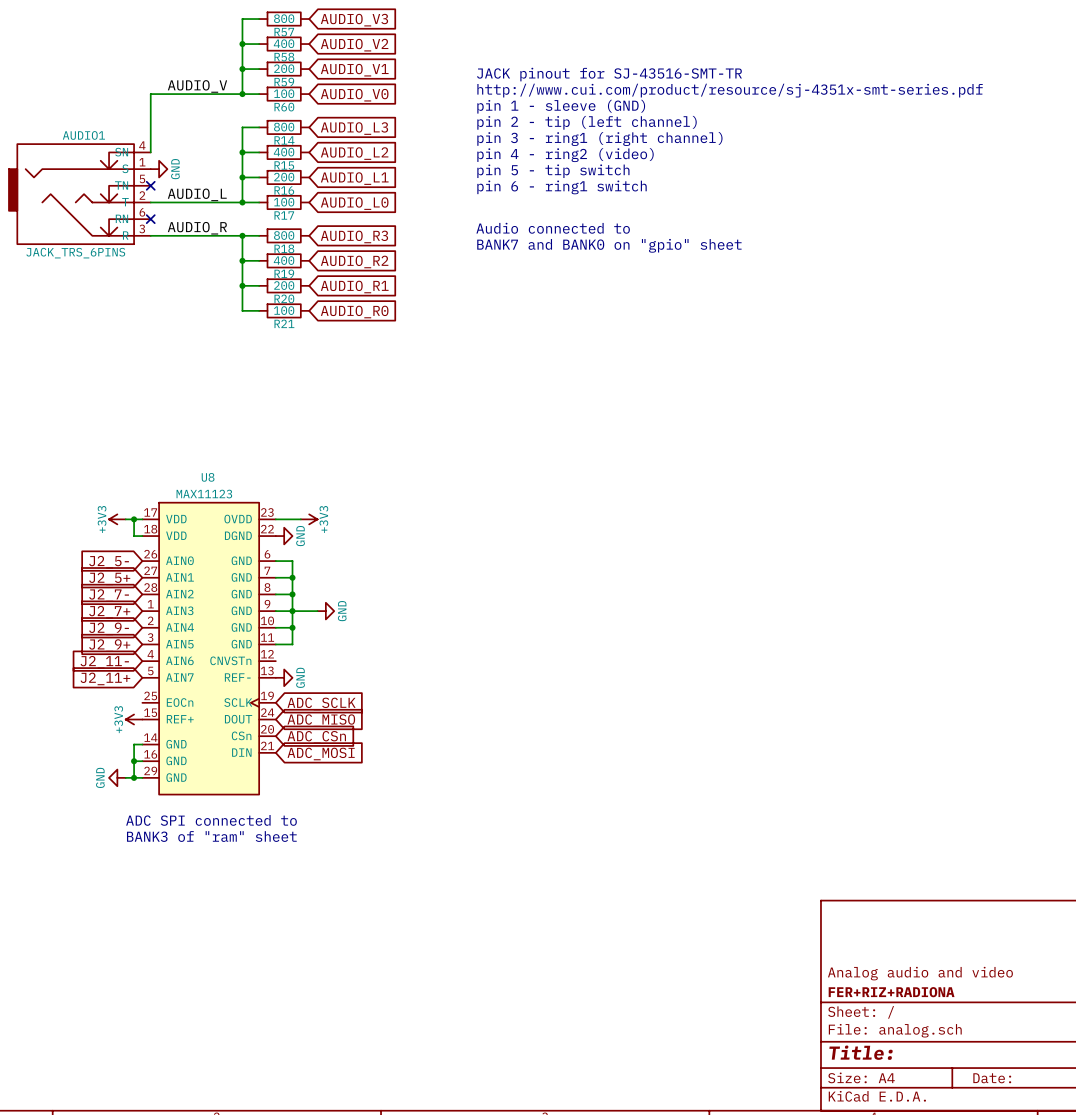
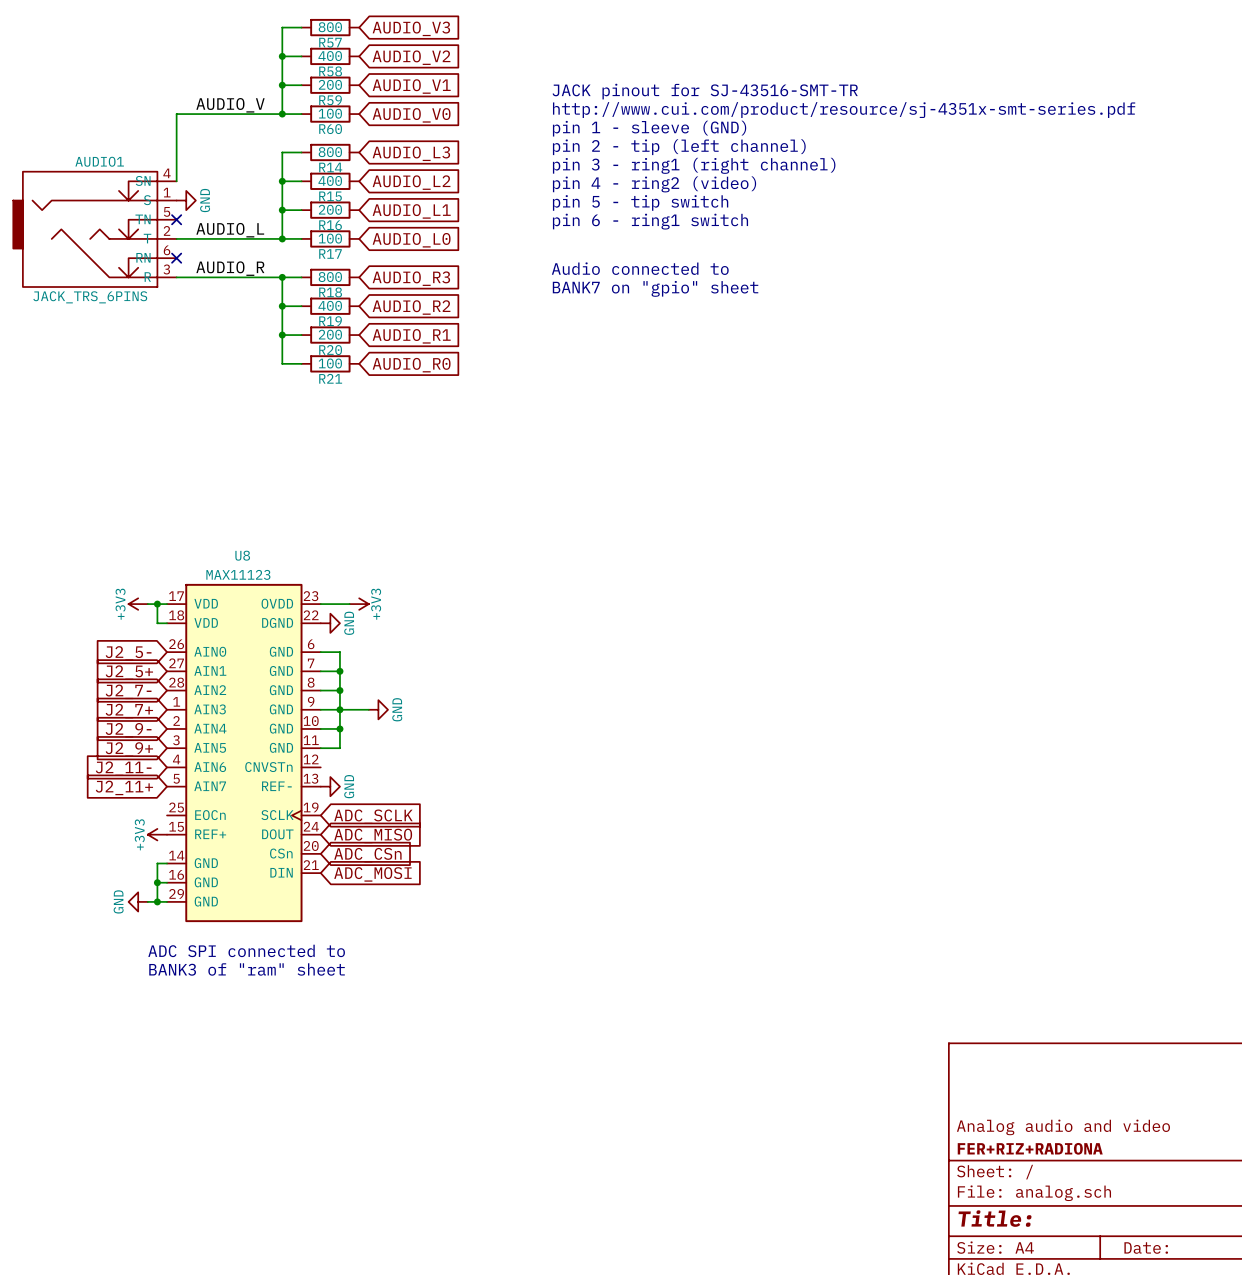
text: BANK7 and BANK0 on "gpio" sheet (609, 245) -> BANK7 on "gpio" sheet (655, 288)

